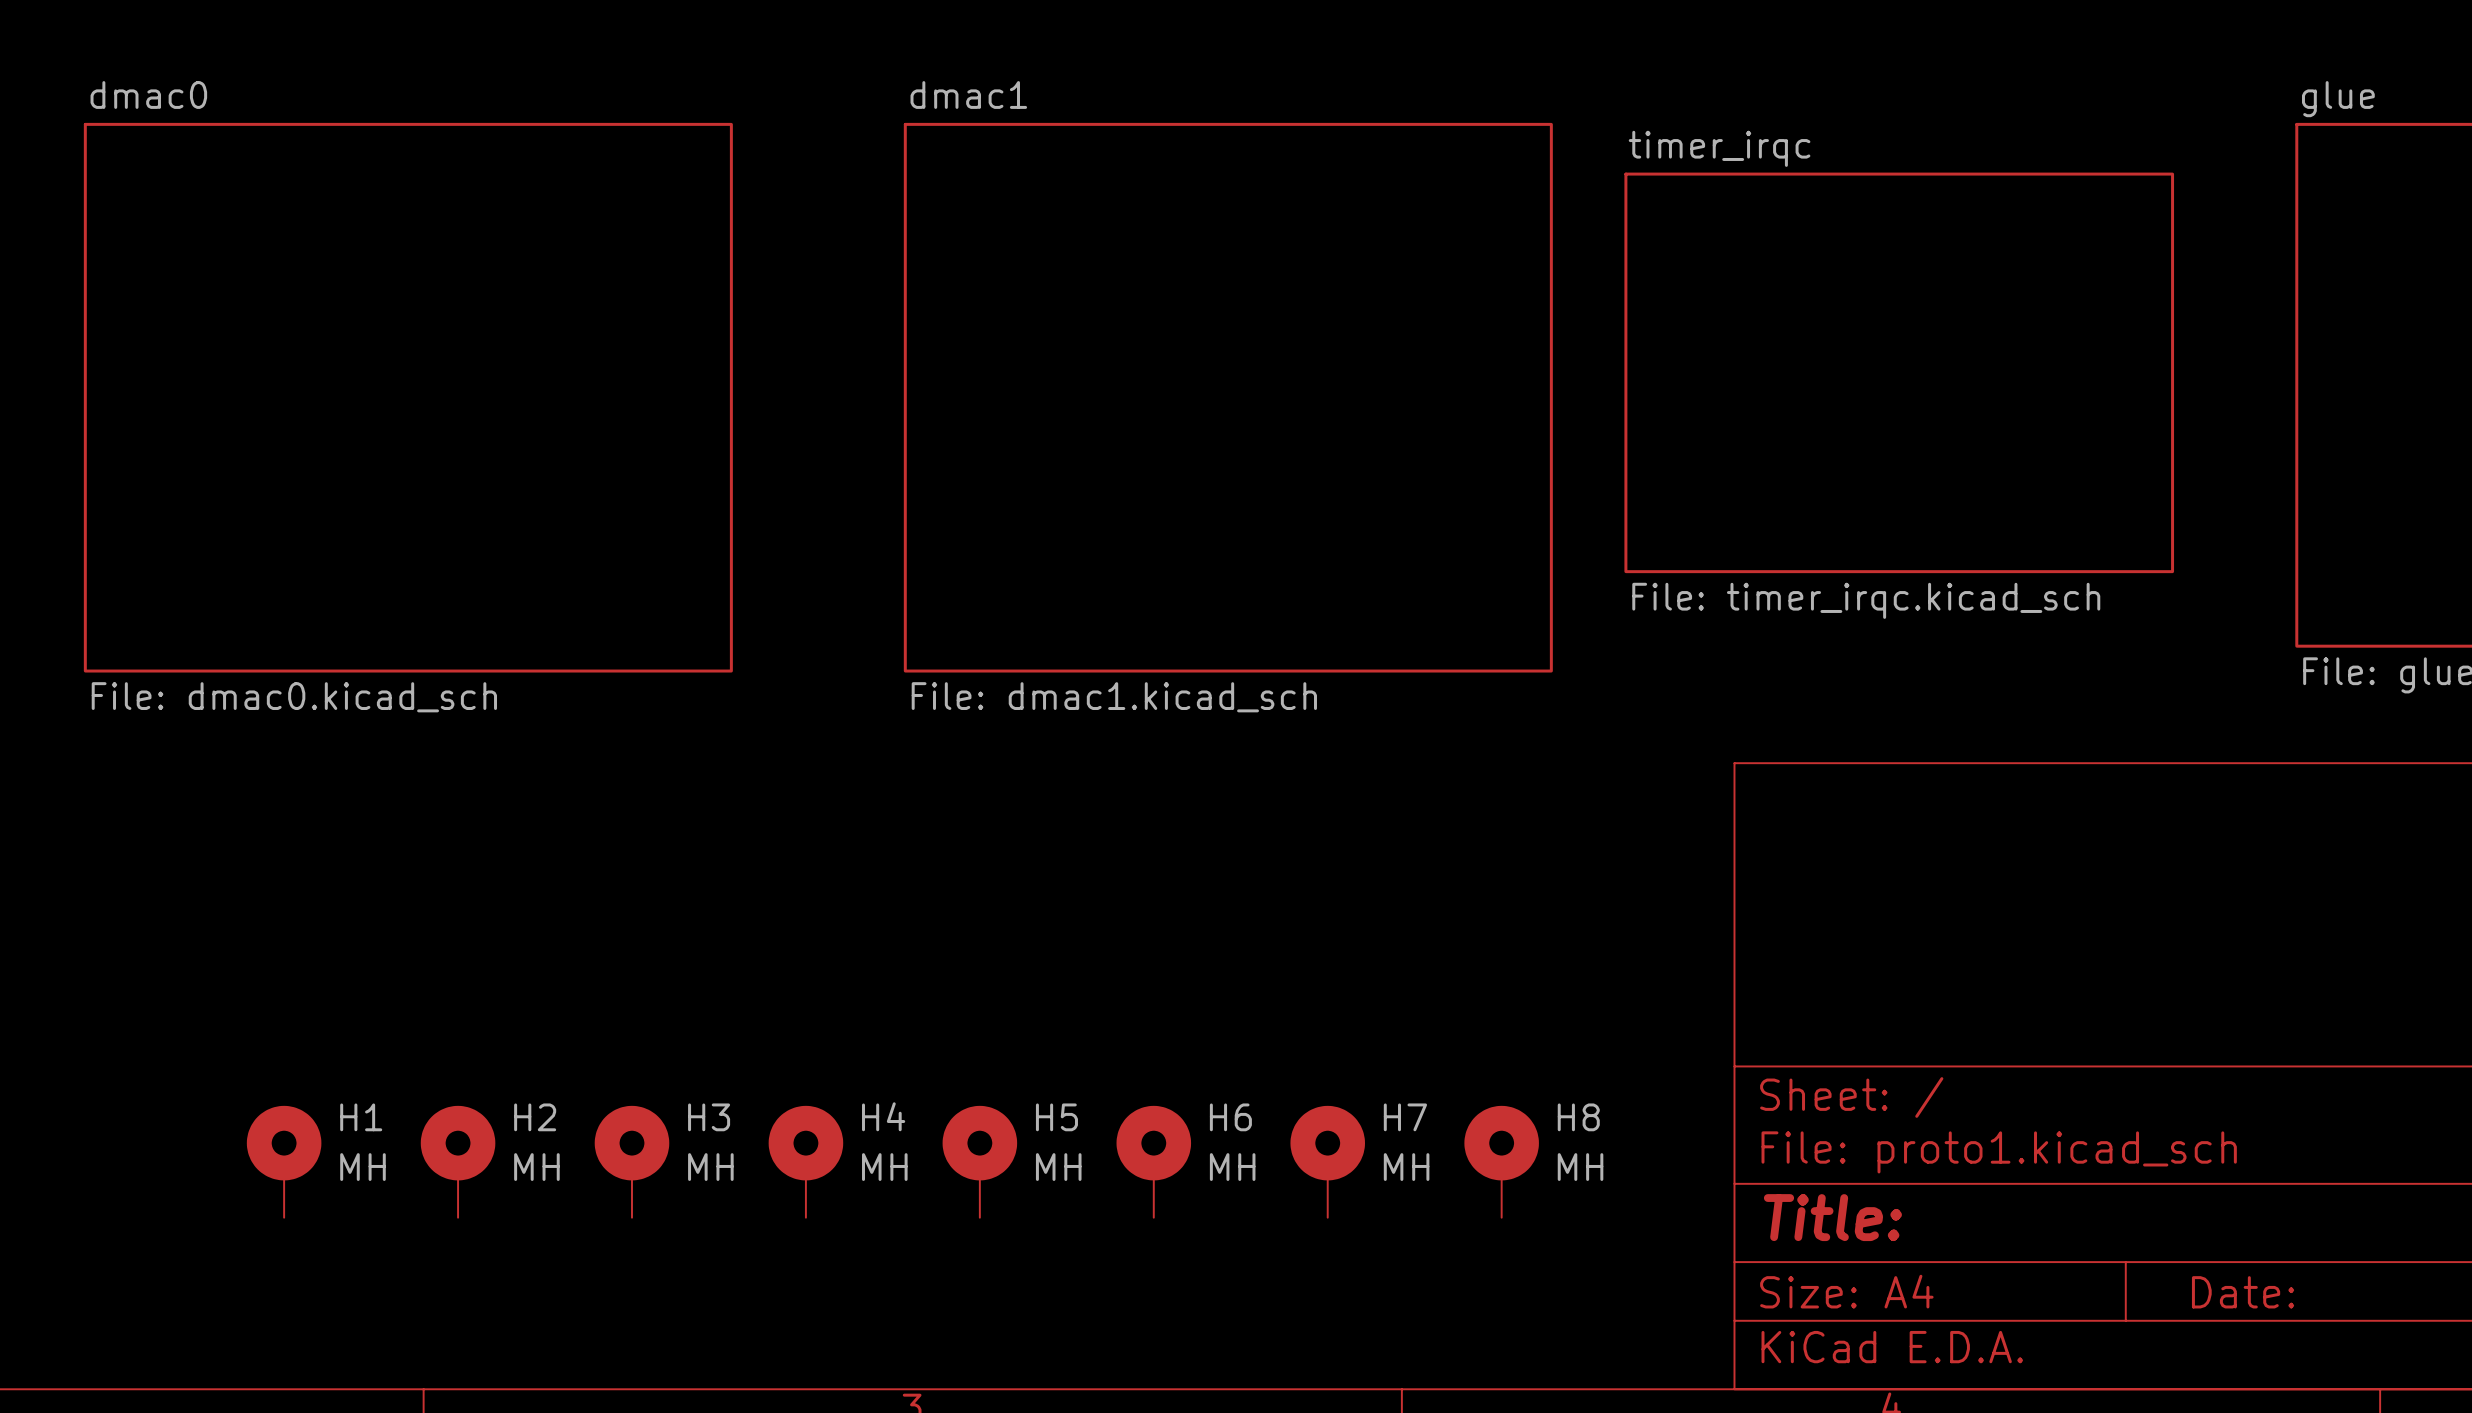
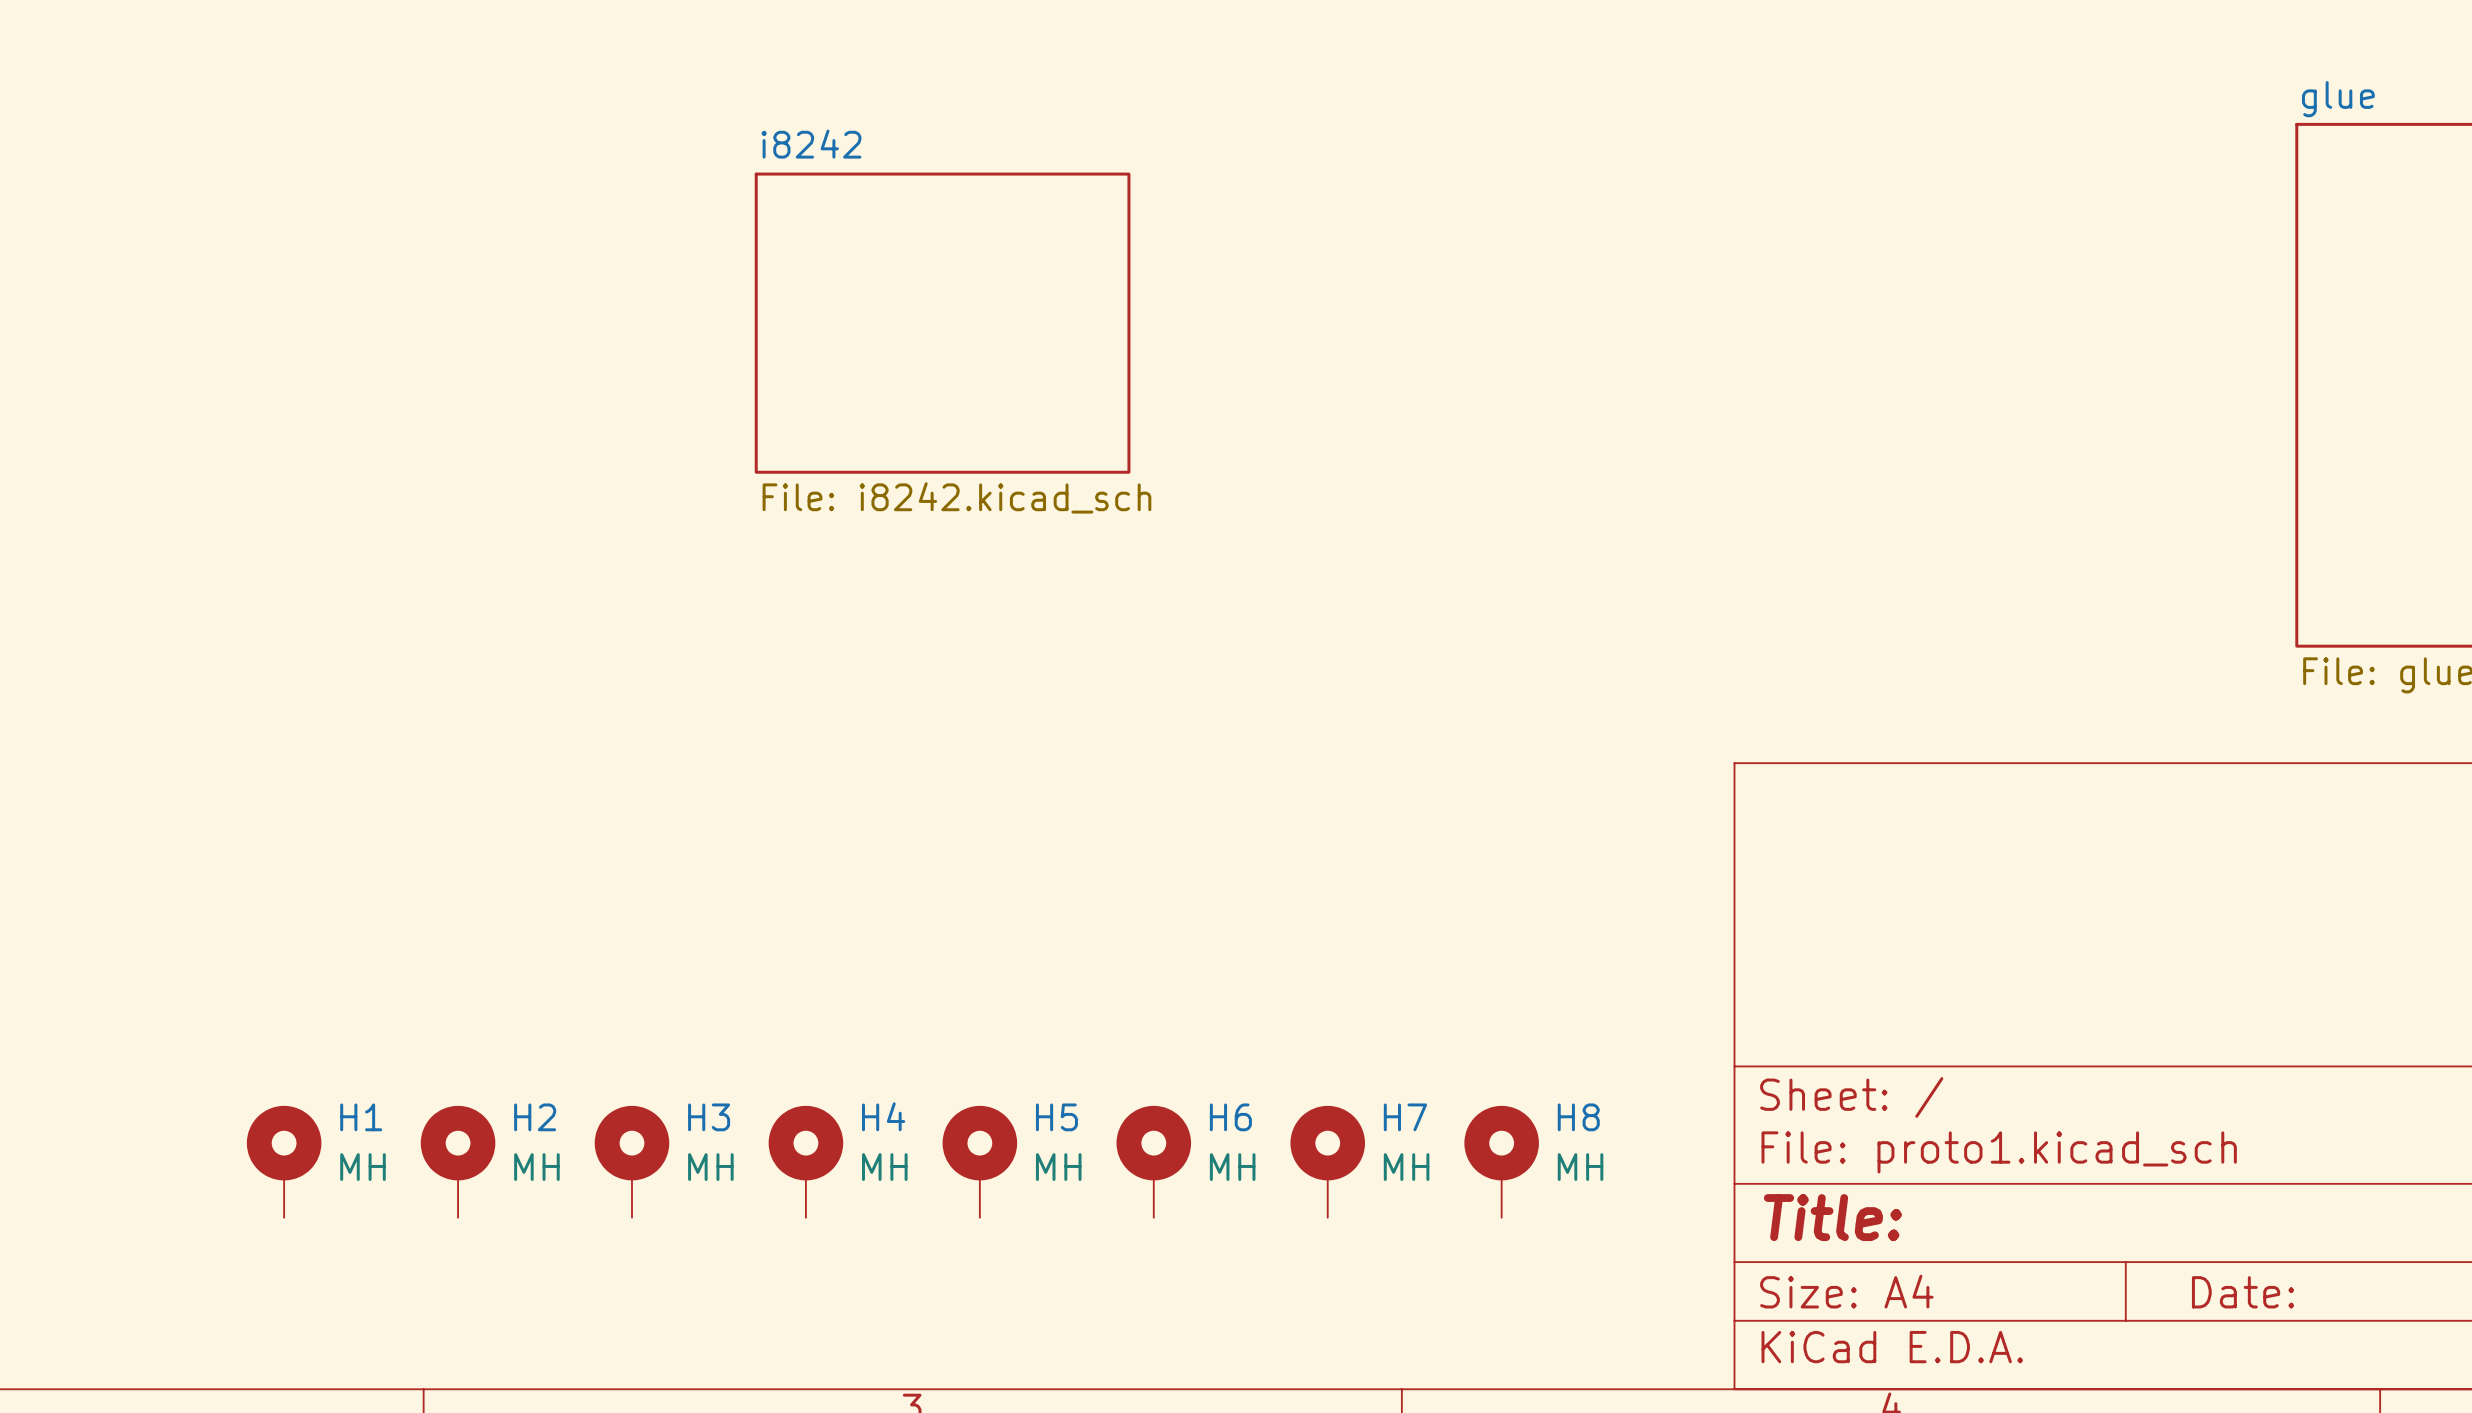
sheet i8242: none -> File: i8242.kicad_sch (942, 323)
sheet timer_irqc: File: timer_irqc.kicad_sch (1899, 372) -> none
sheet dmac0: File: dmac0.kicad_sch (408, 397) -> none
sheet dmac1: File: dmac1.kicad_sch (1228, 397) -> none

